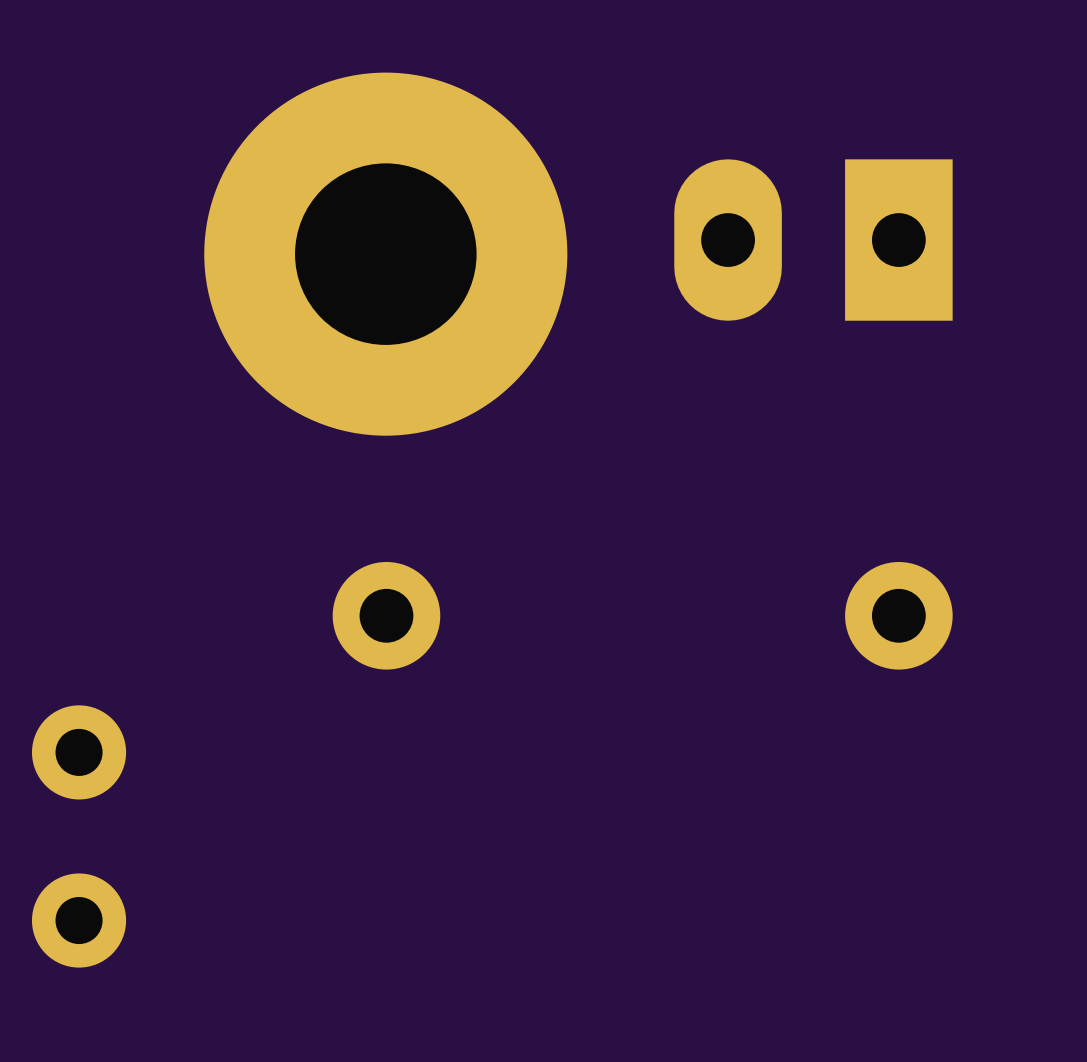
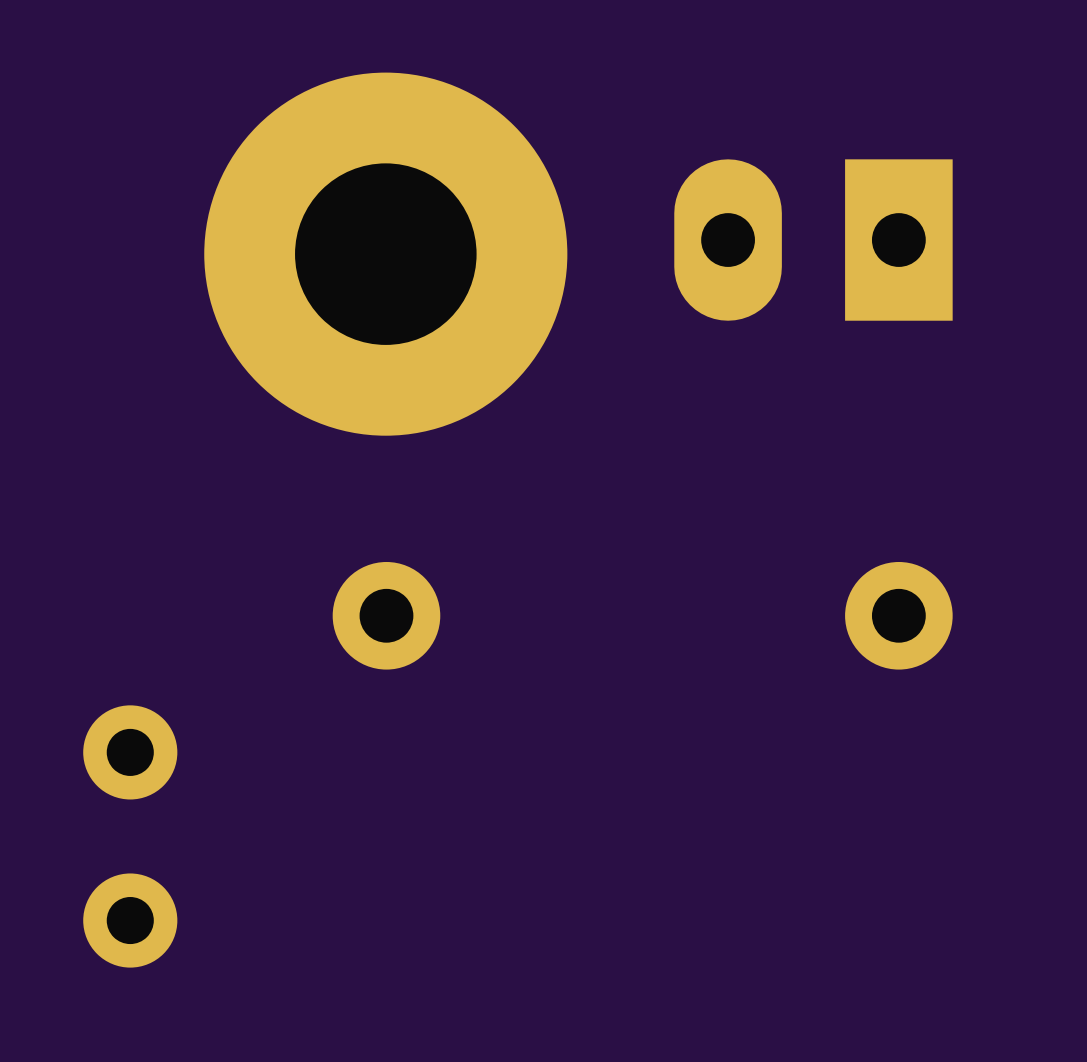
part position: (79, 836) -> (130, 836)

